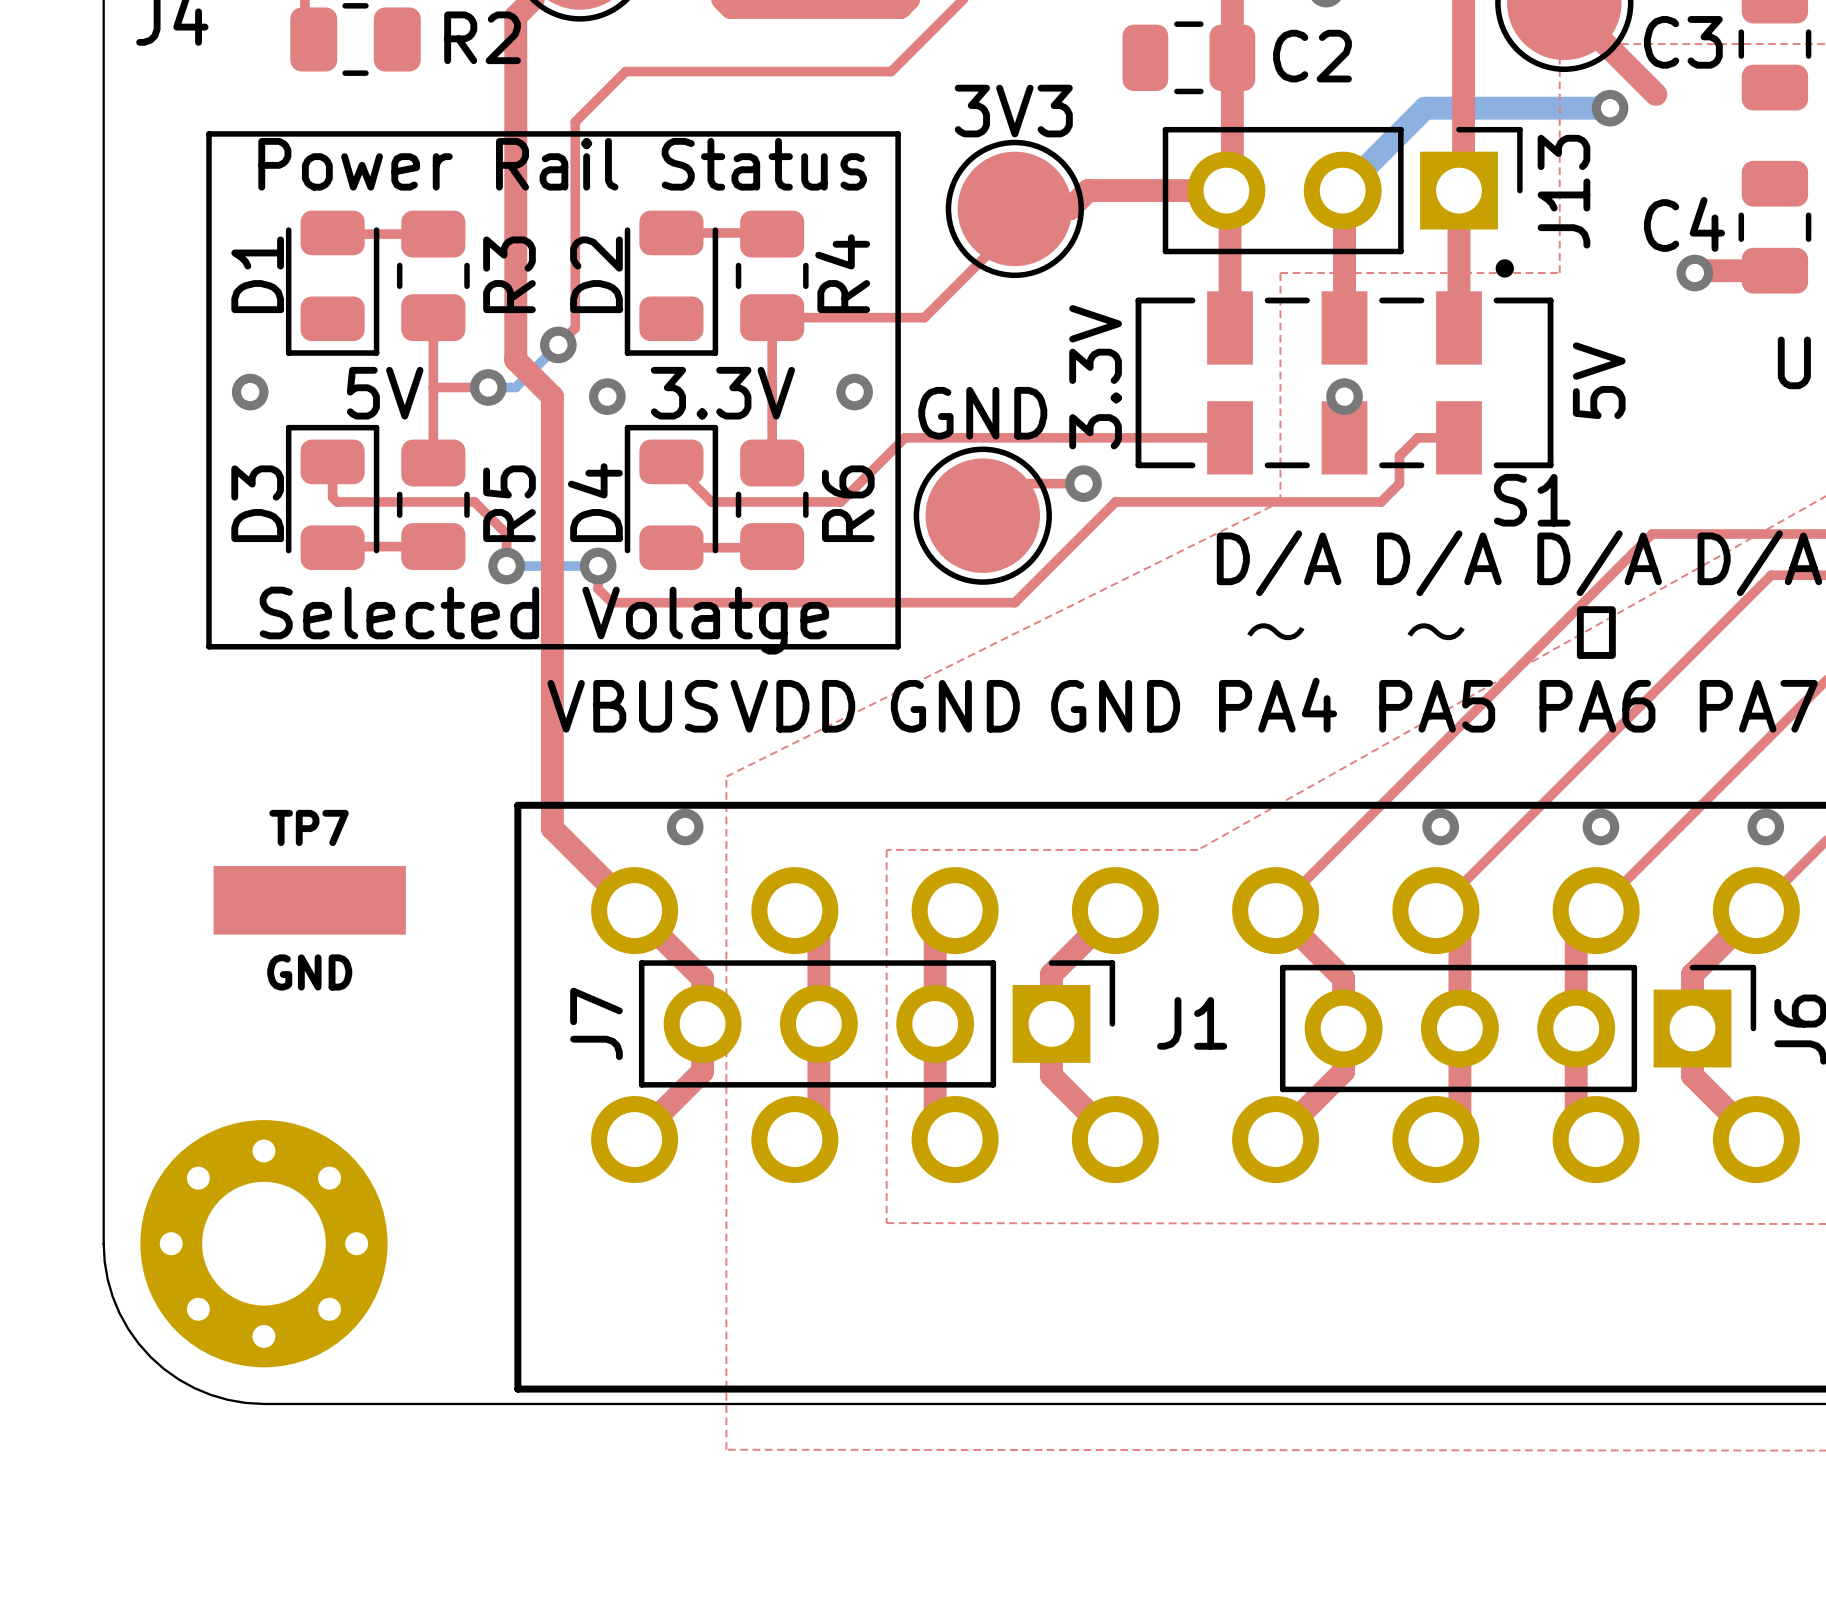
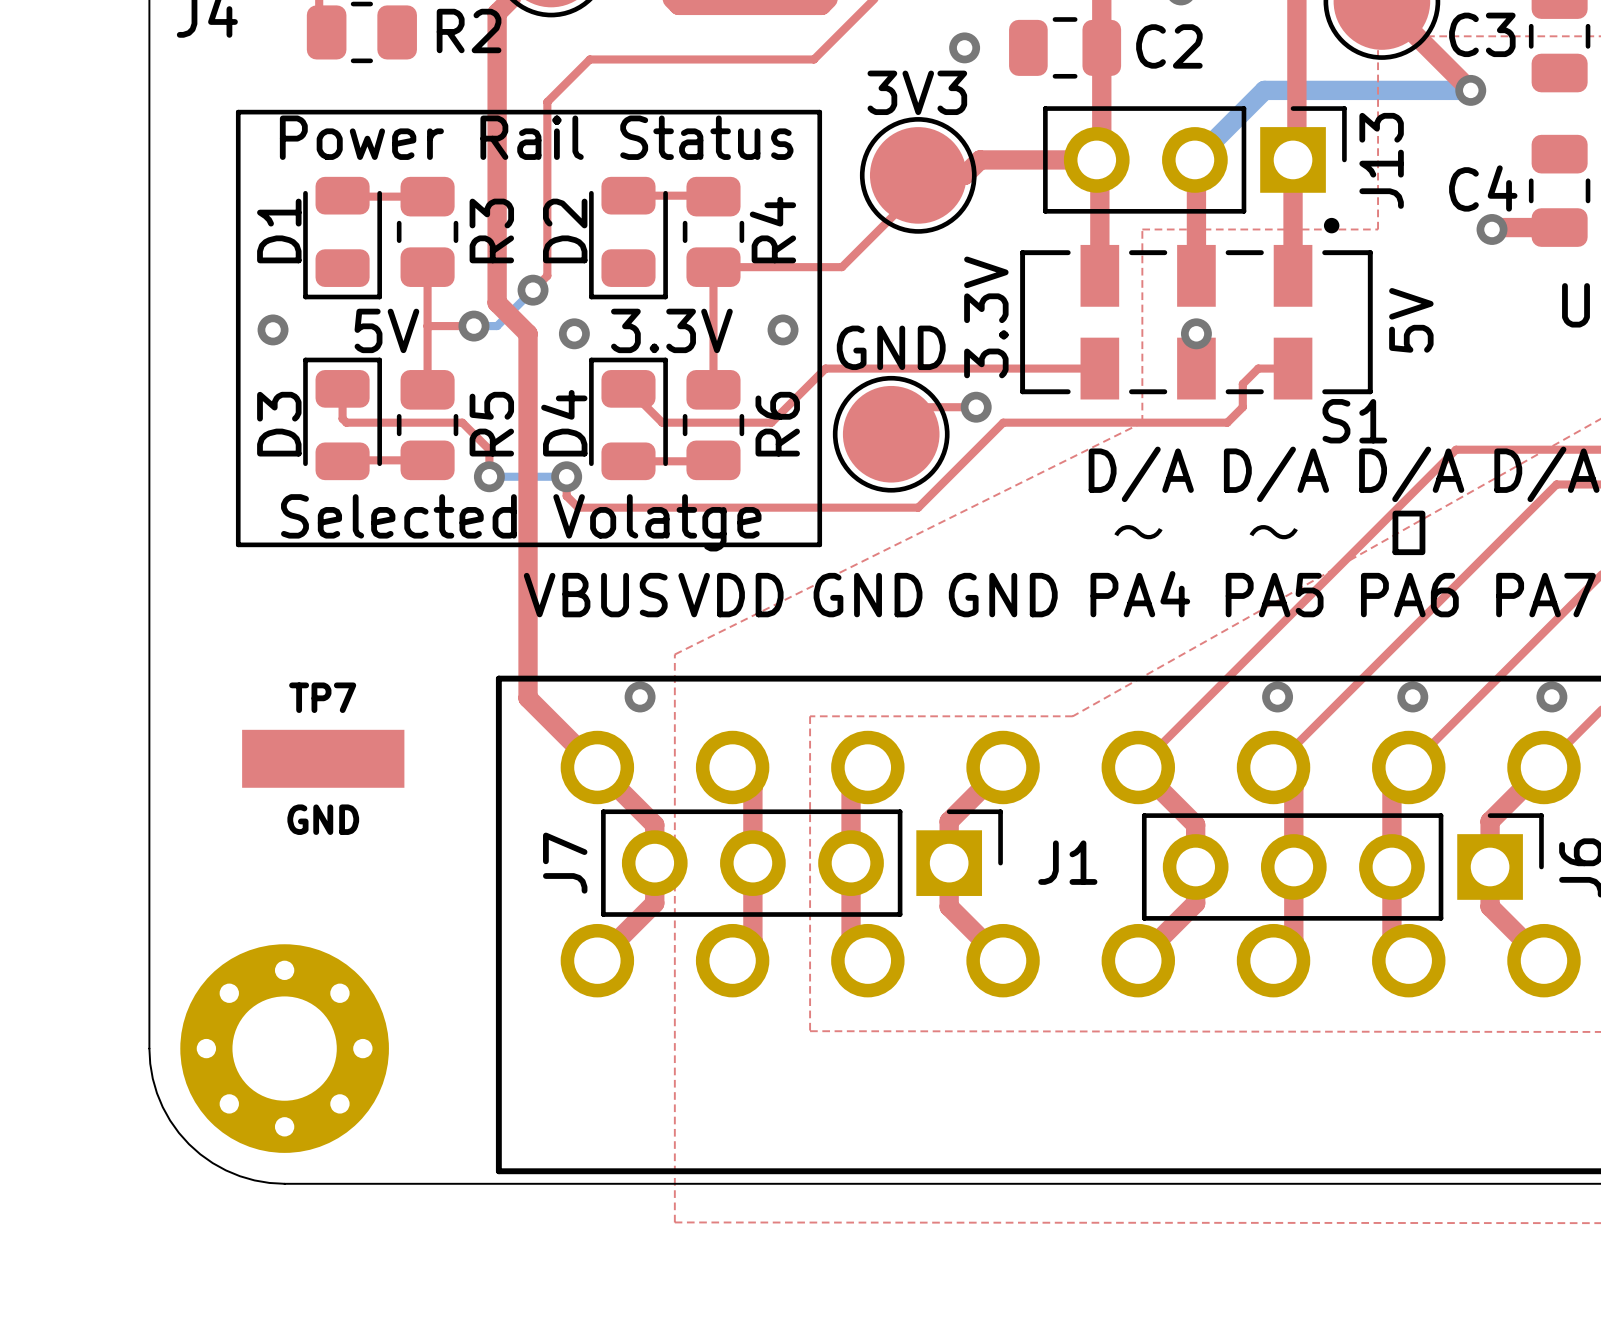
via: none -> (964, 47)
bottom track: none -> (1420, 90) (1470, 90)
via position: (1610, 108) -> (1470, 90)

